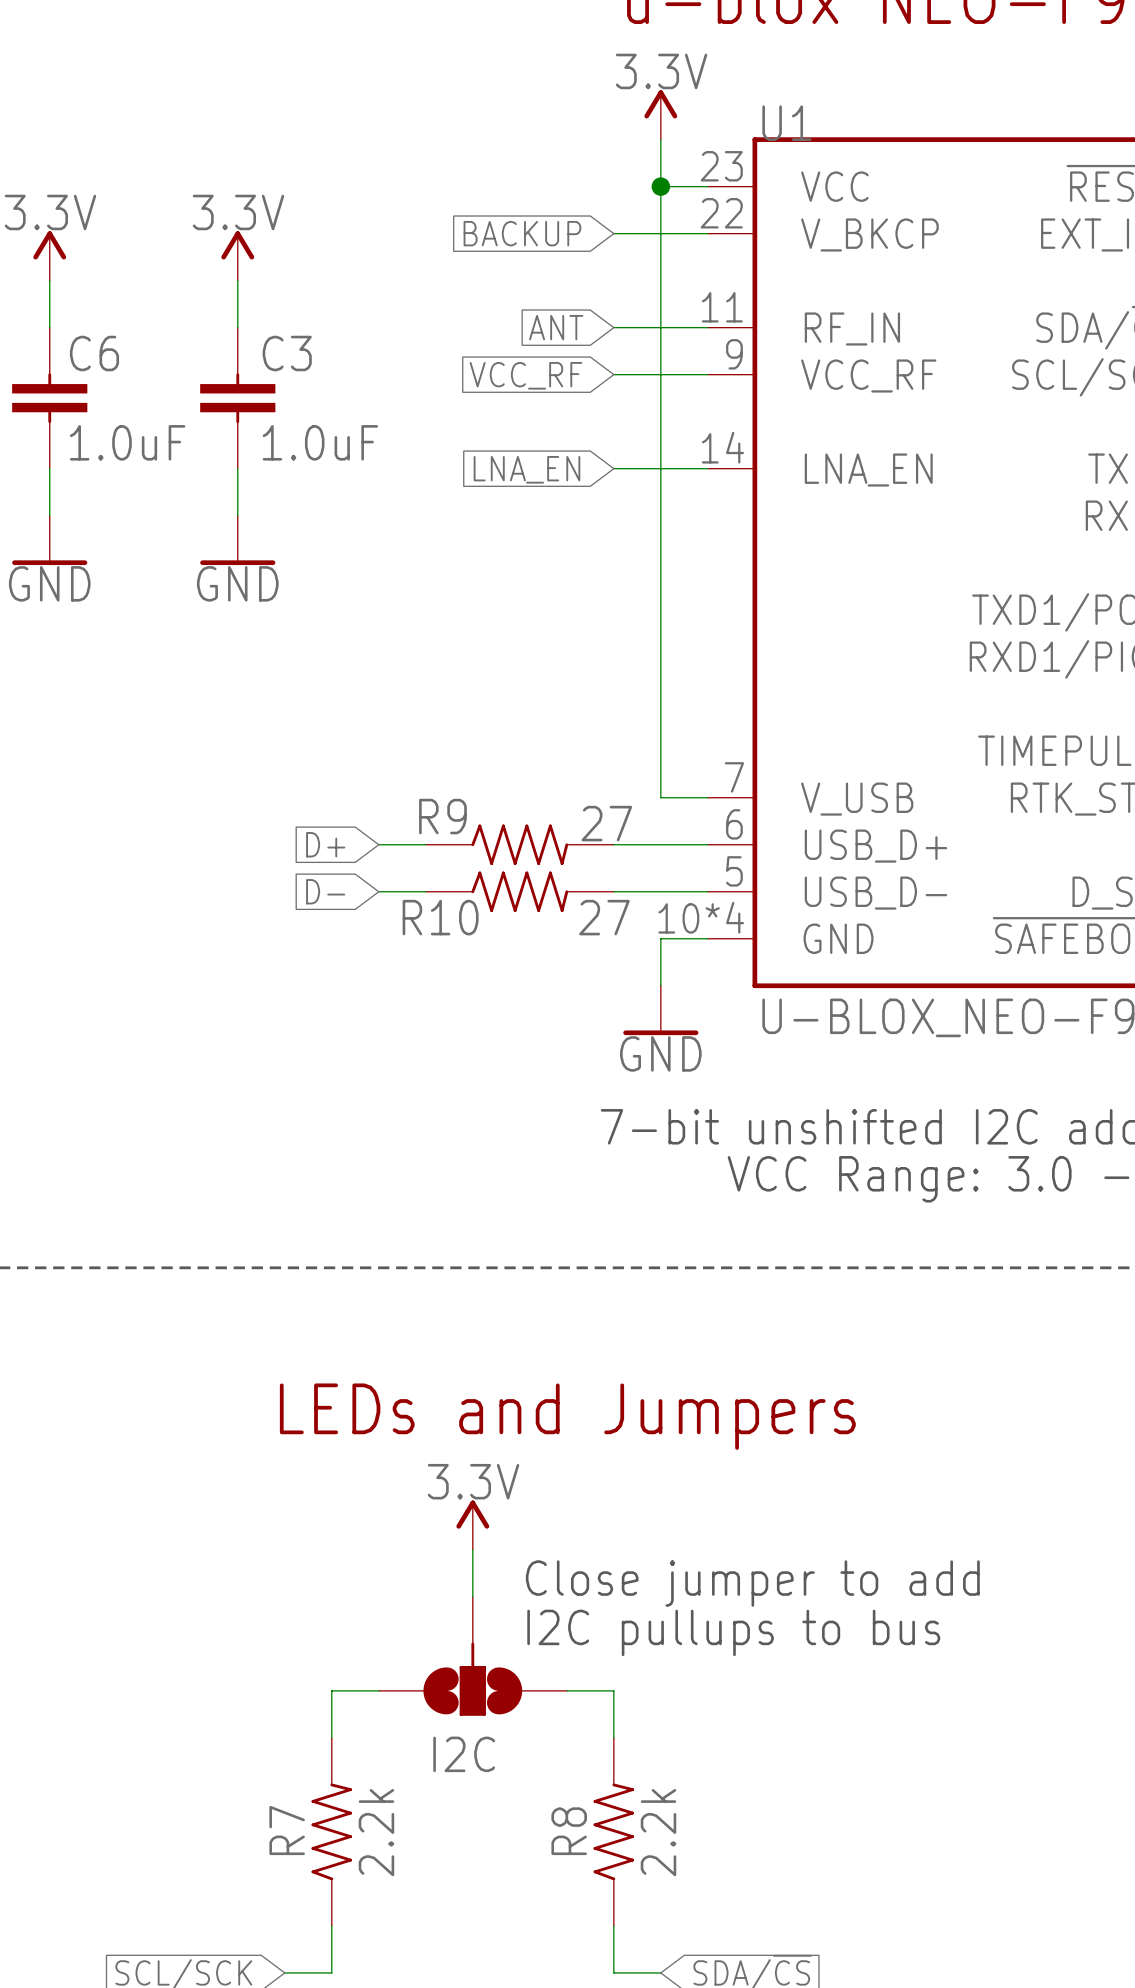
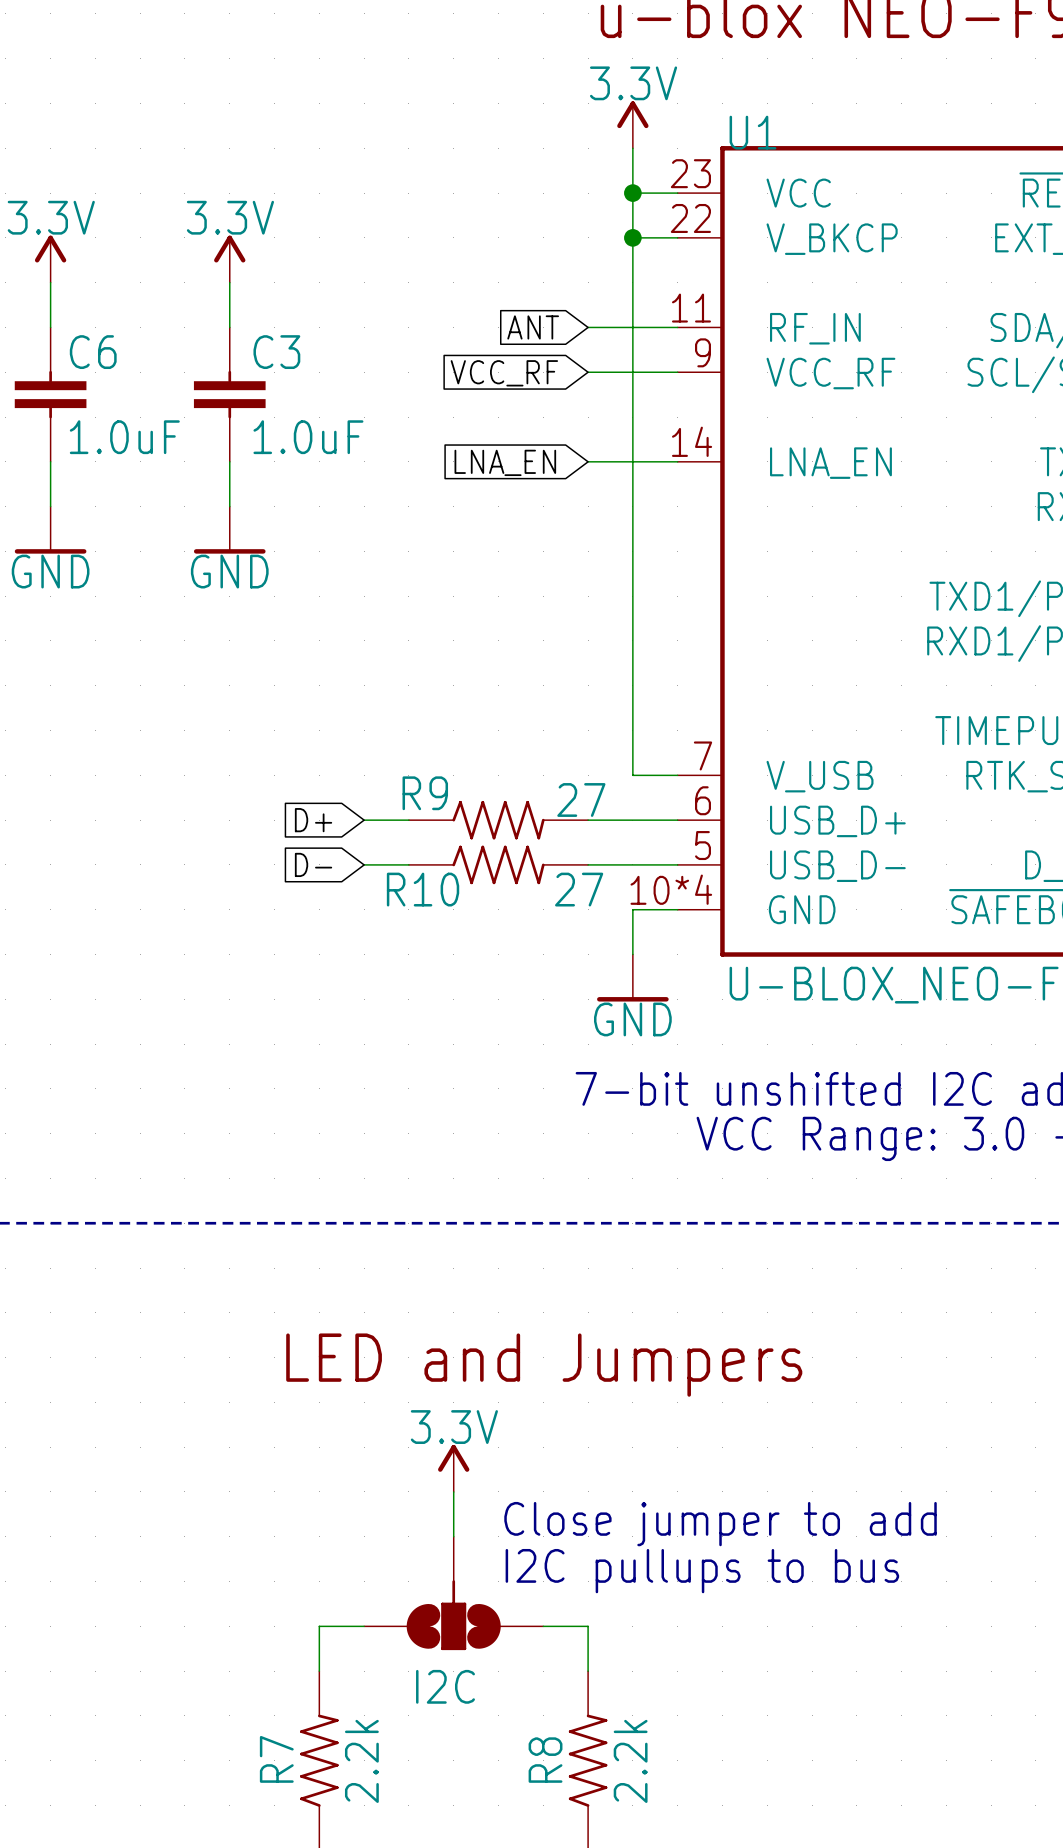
global label: BACKUP (522, 233) -> none
wire: (613, 233) (660, 233) -> none
junction: none -> (632, 237)
text: LEDs and Jumpers (567, 1416) -> LED and Jumpers (544, 1365)

